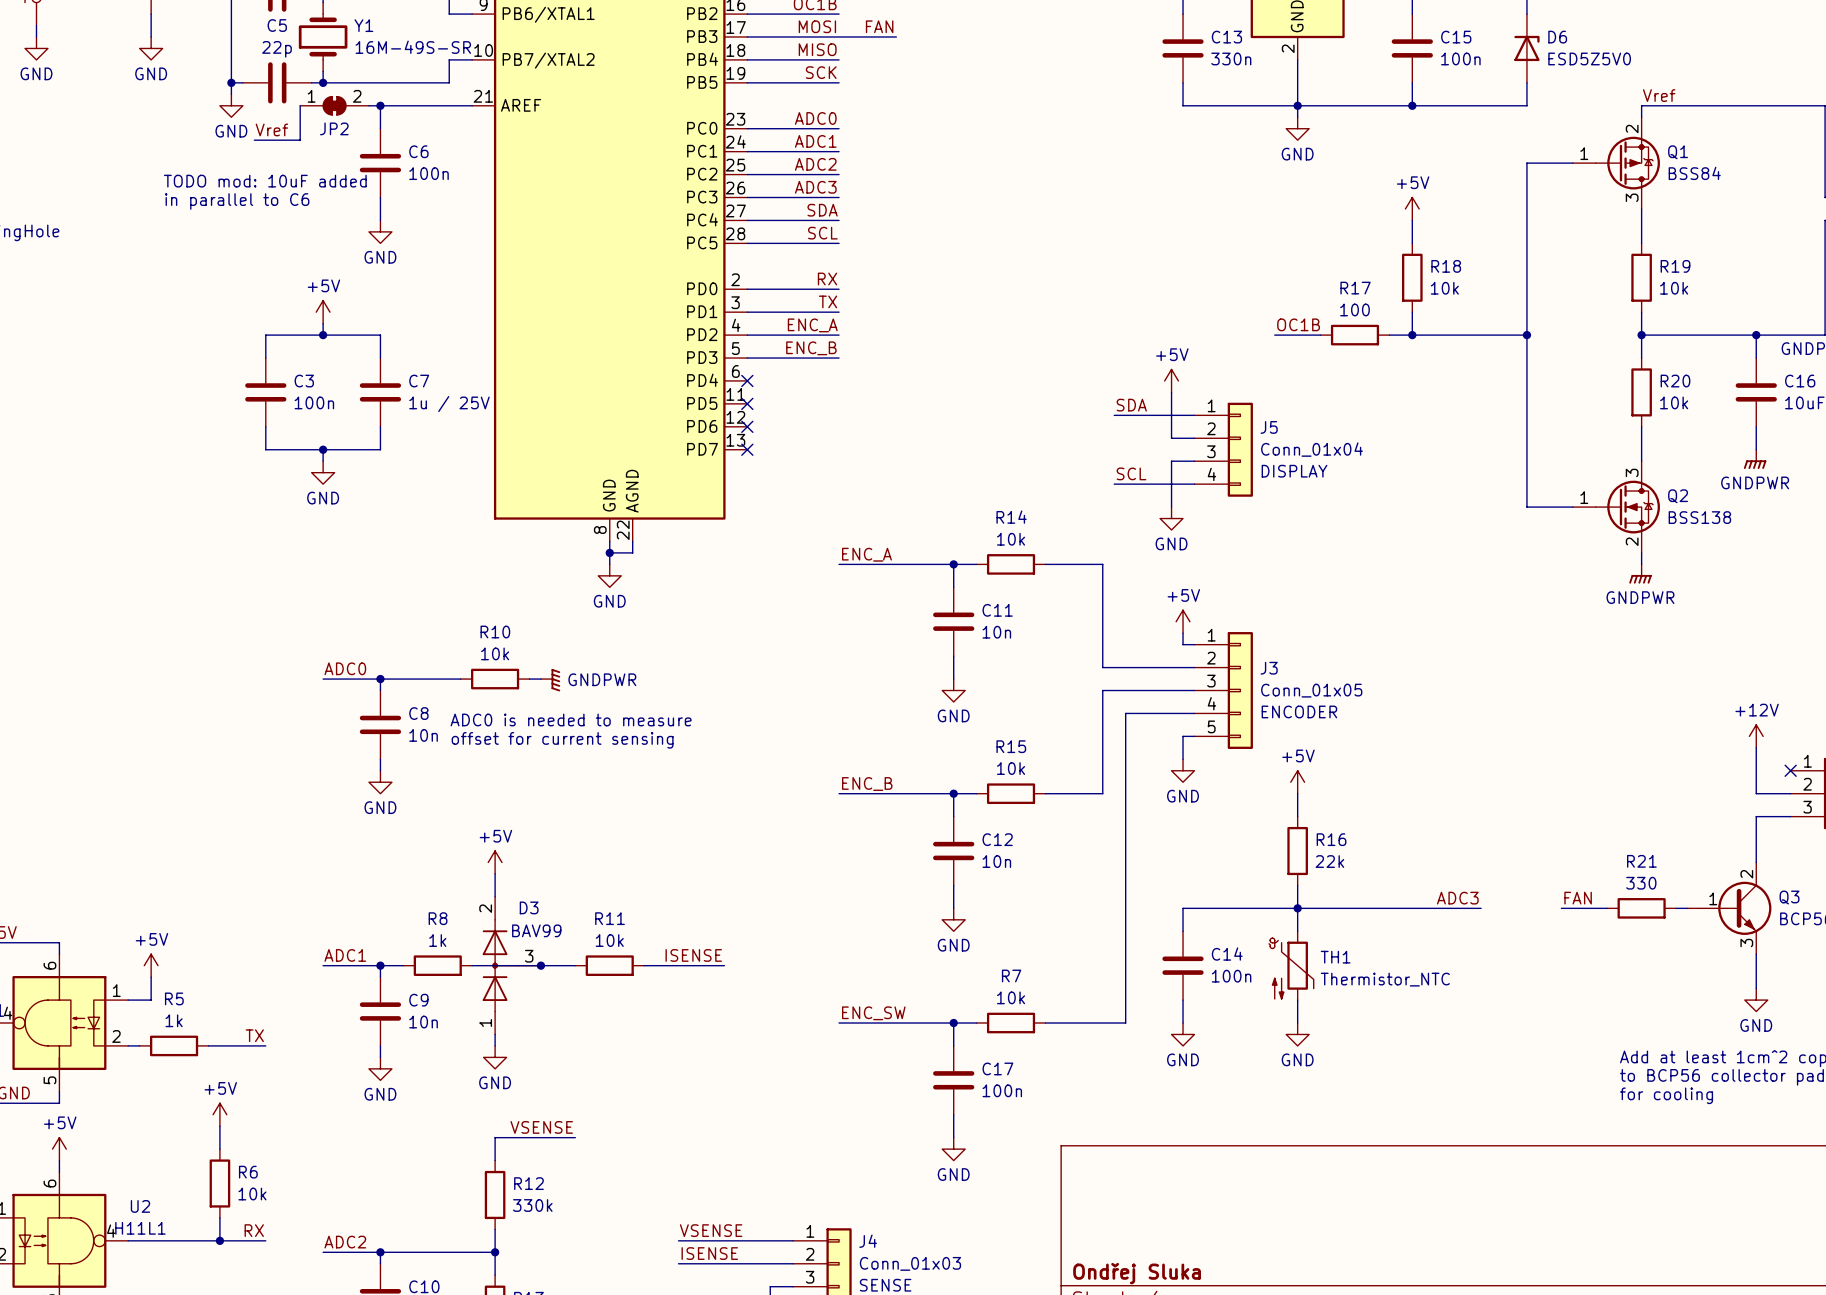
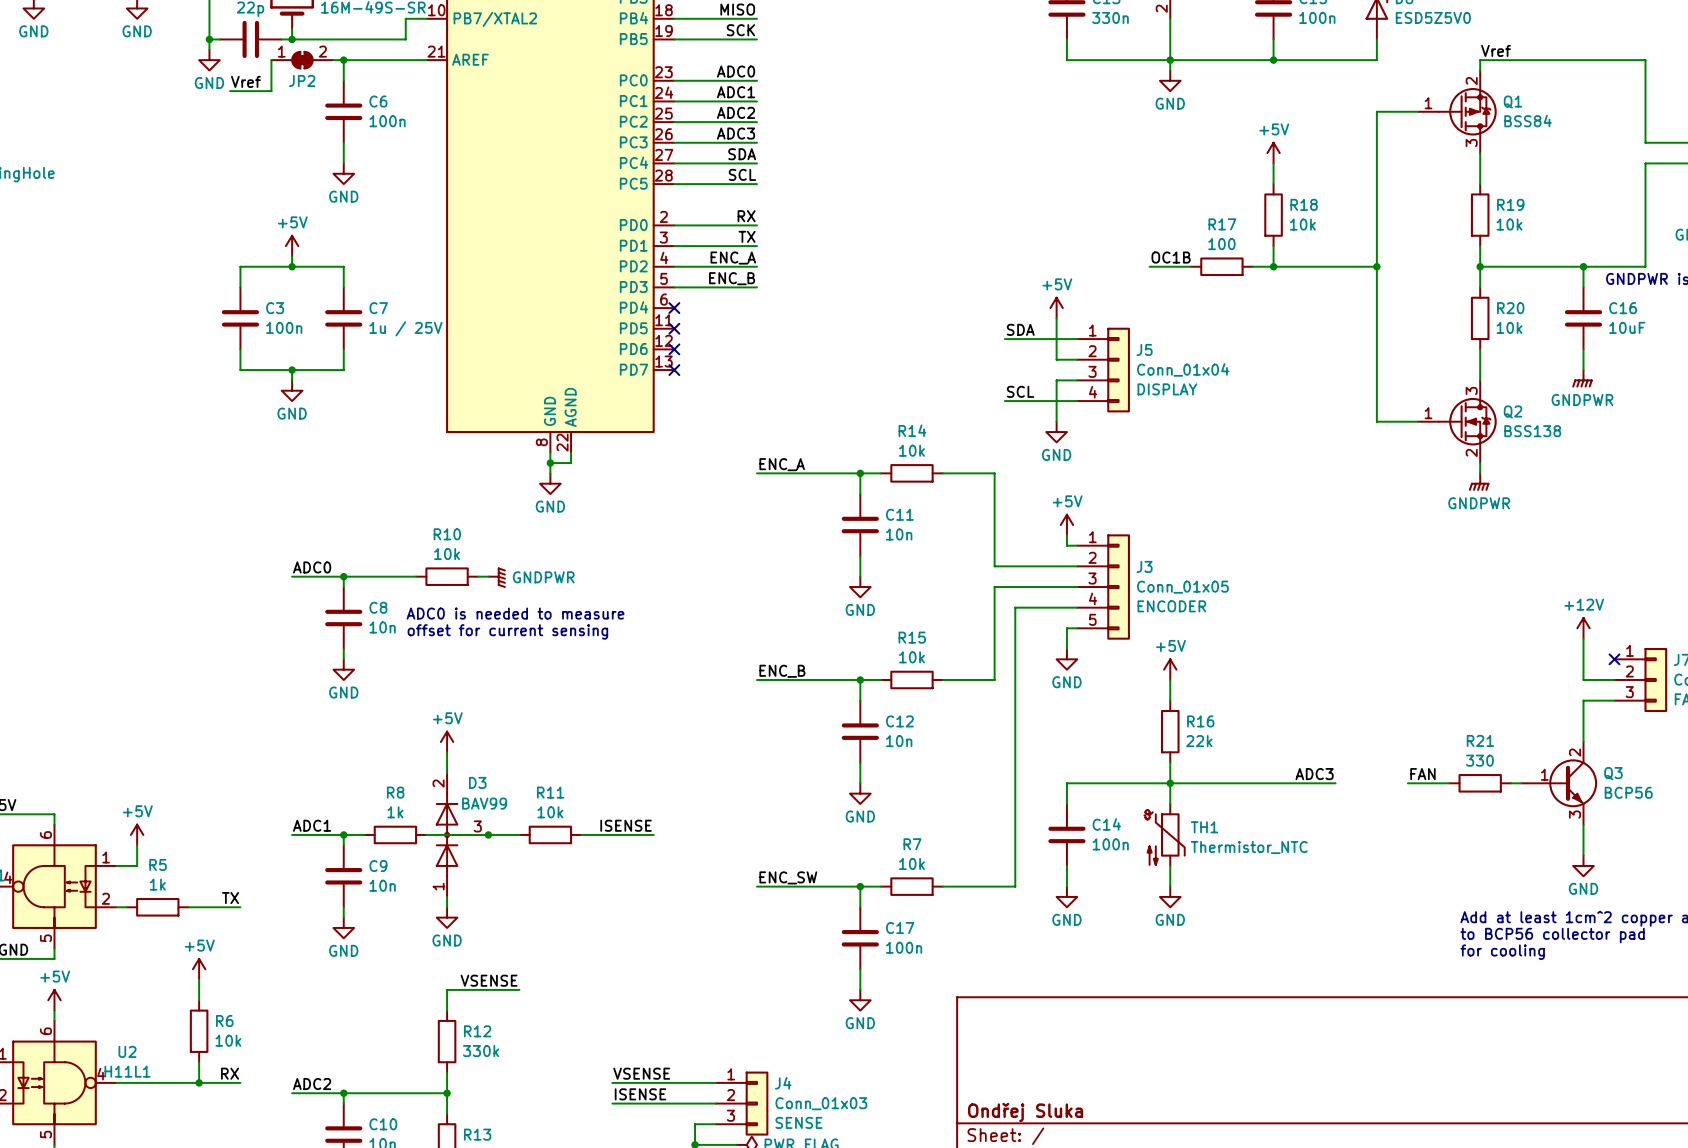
text: TODO mod: 10uF added (265, 181) -> none
text: in parallel to C6 (237, 201) -> none

